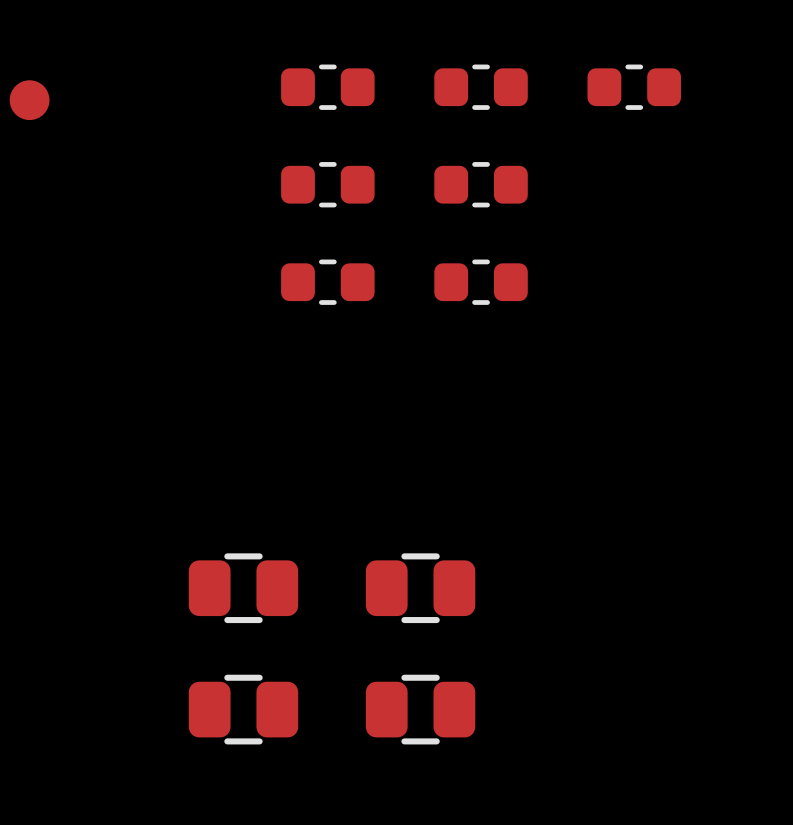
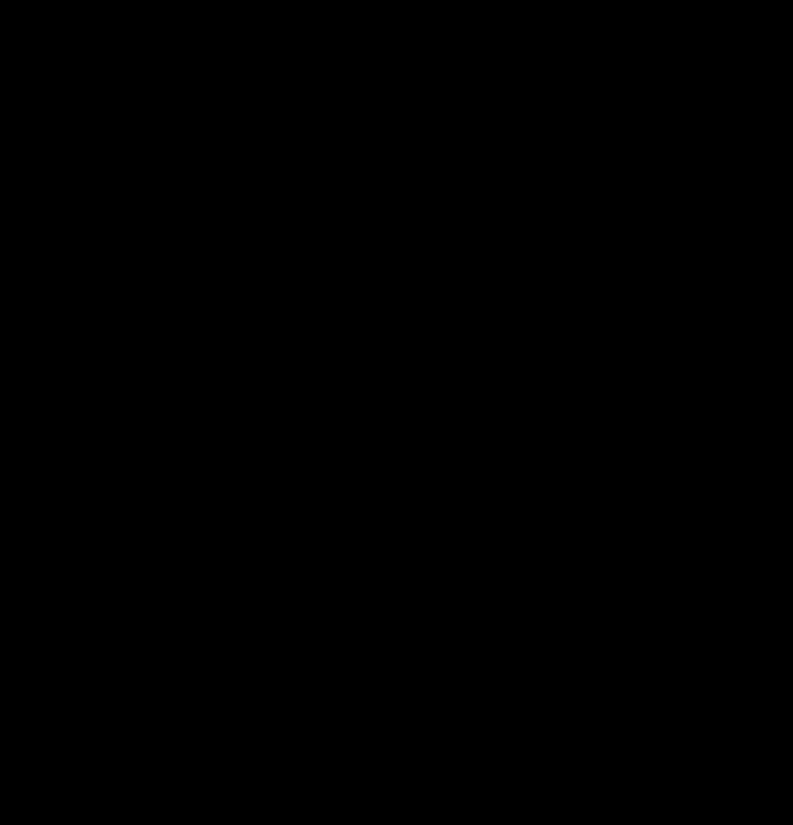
part: (327, 87) -> none
part: (481, 87) -> none
part: (634, 87) -> none
part: (29, 100) -> none
part: (327, 184) -> none
part: (481, 184) -> none
part: (327, 282) -> none
part: (481, 282) -> none
part: (243, 588) -> none
part: (420, 588) -> none
part: (243, 709) -> none
part: (420, 709) -> none

